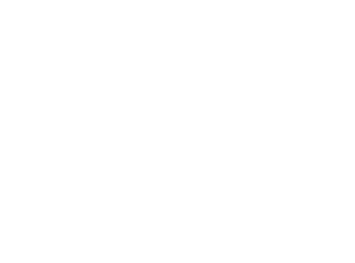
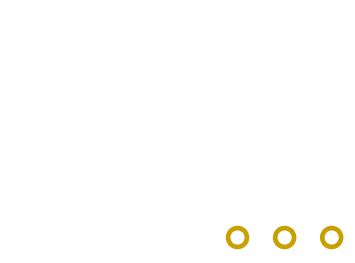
part: none -> (284, 237)

